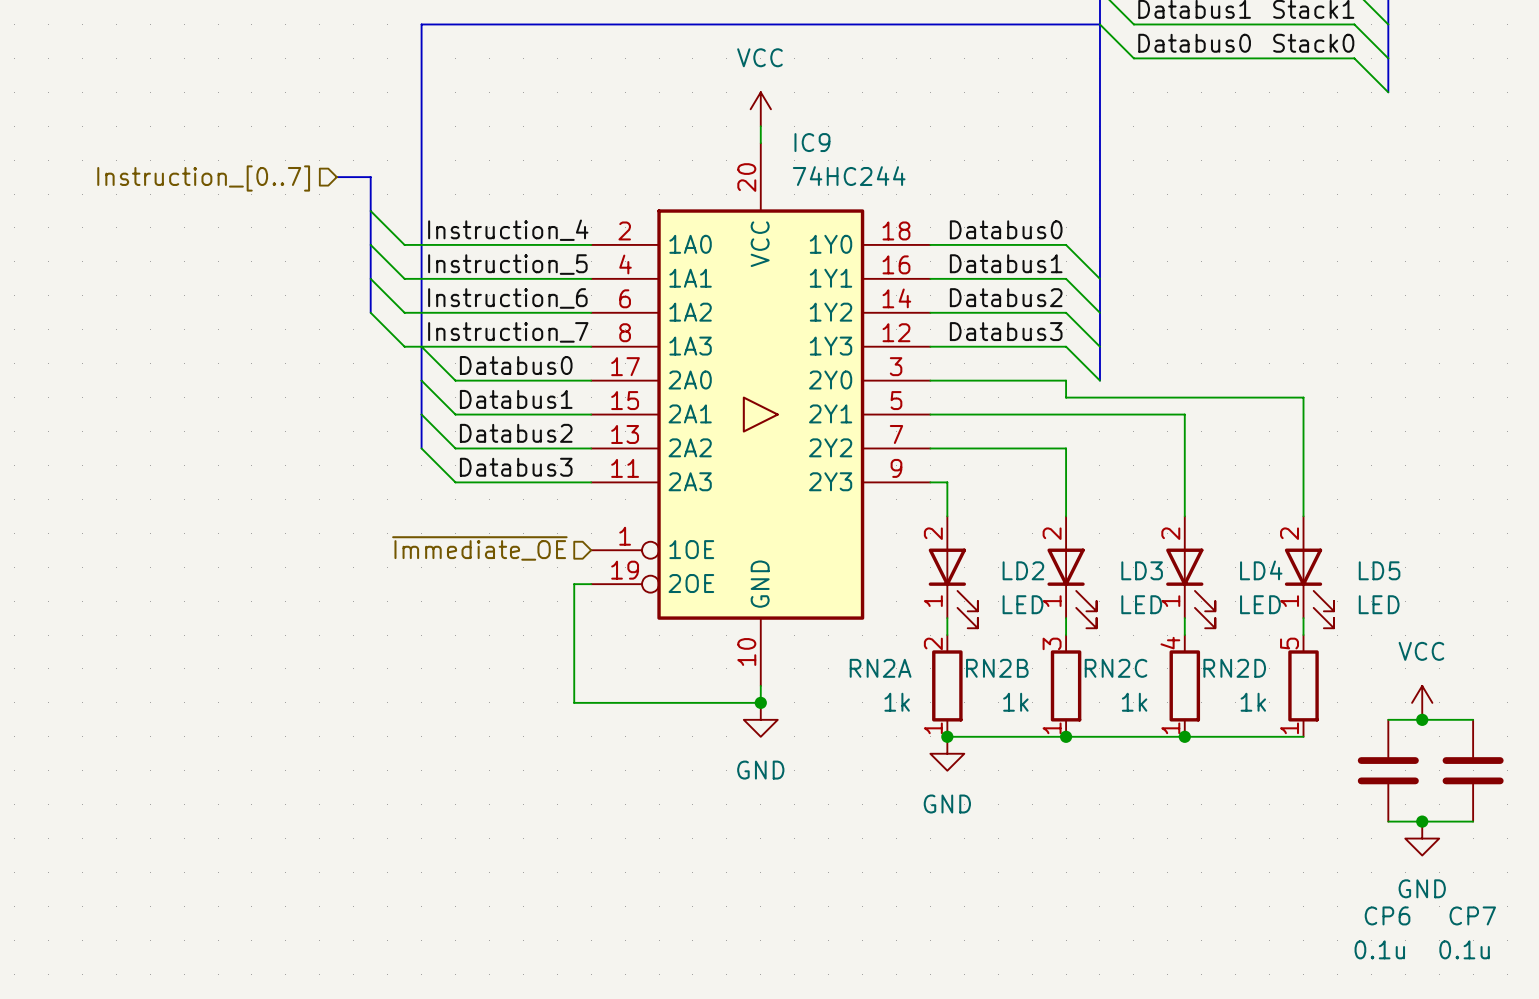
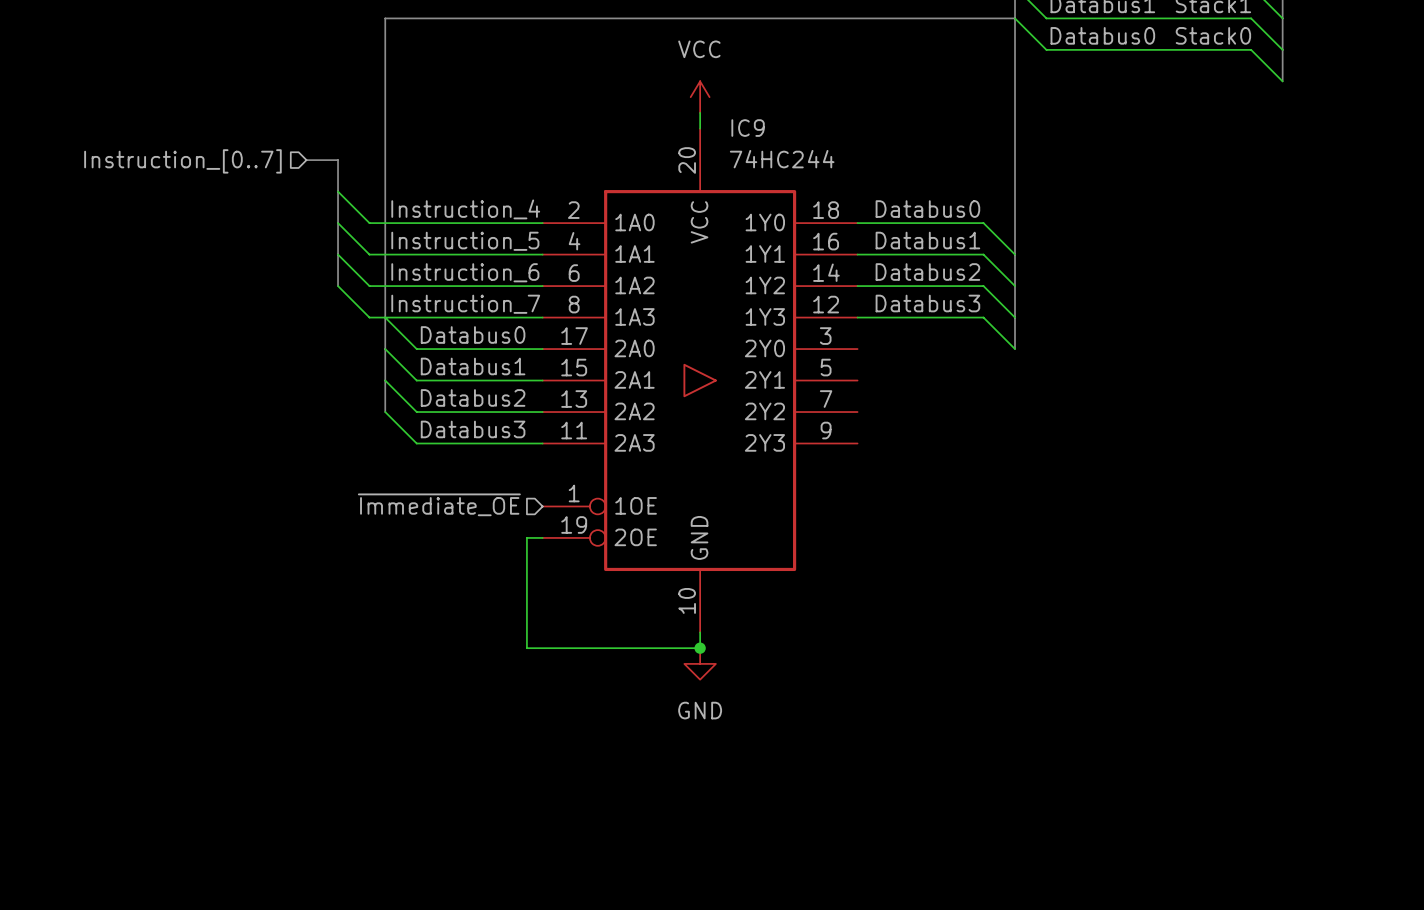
wire: (930, 380) (1066, 380) (1066, 397) (1303, 397) (1303, 516) -> none
wire: (930, 414) (1184, 414) (1184, 516) -> none
wire: (930, 448) (1066, 448) (1066, 516) -> none
wire: (930, 482) (947, 482) (947, 516) -> none
LD2: LED (953, 572) -> none
LD3: LED (1072, 572) -> none
LD4: LED (1190, 572) -> none
LD5: LED (1309, 572) -> none
wire: (947, 618) (947, 635) -> none
wire: (1066, 618) (1066, 635) -> none
wire: (1184, 618) (1184, 635) -> none
wire: (1303, 618) (1303, 635) -> none
RN2A: 1k (947, 685) -> none
RN2B: 1k (1066, 685) -> none
RN2C: 1k (1184, 685) -> none
RN2D: 1k (1303, 685) -> none
power symbol: VCC (1422, 702) -> none
wire: (1388, 719) (1473, 719) -> none
junction: (1422, 719) -> none
wire: (947, 736) (1303, 736) -> none
junction: (947, 736) -> none
junction: (1066, 736) -> none
junction: (1184, 736) -> none
power symbol: GND (947, 753) -> none
CP6: 0.1u (1388, 770) -> none
CP7: 0.1u (1473, 770) -> none
wire: (1388, 821) (1473, 821) -> none
junction: (1422, 821) -> none
power symbol: GND (1422, 838) -> none

